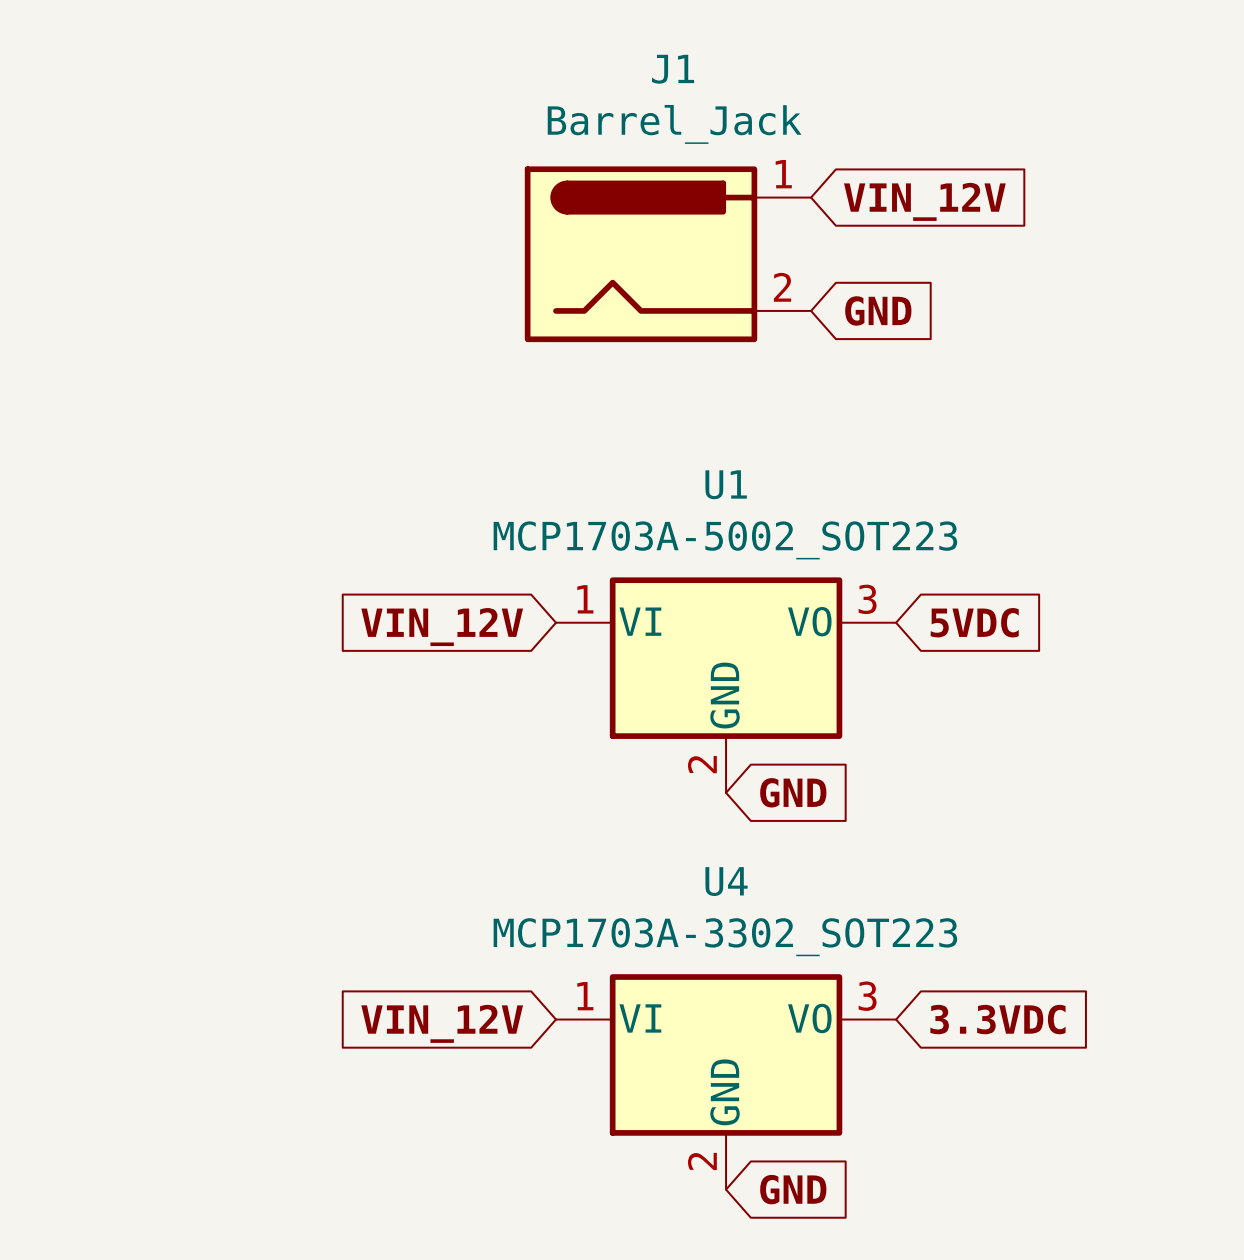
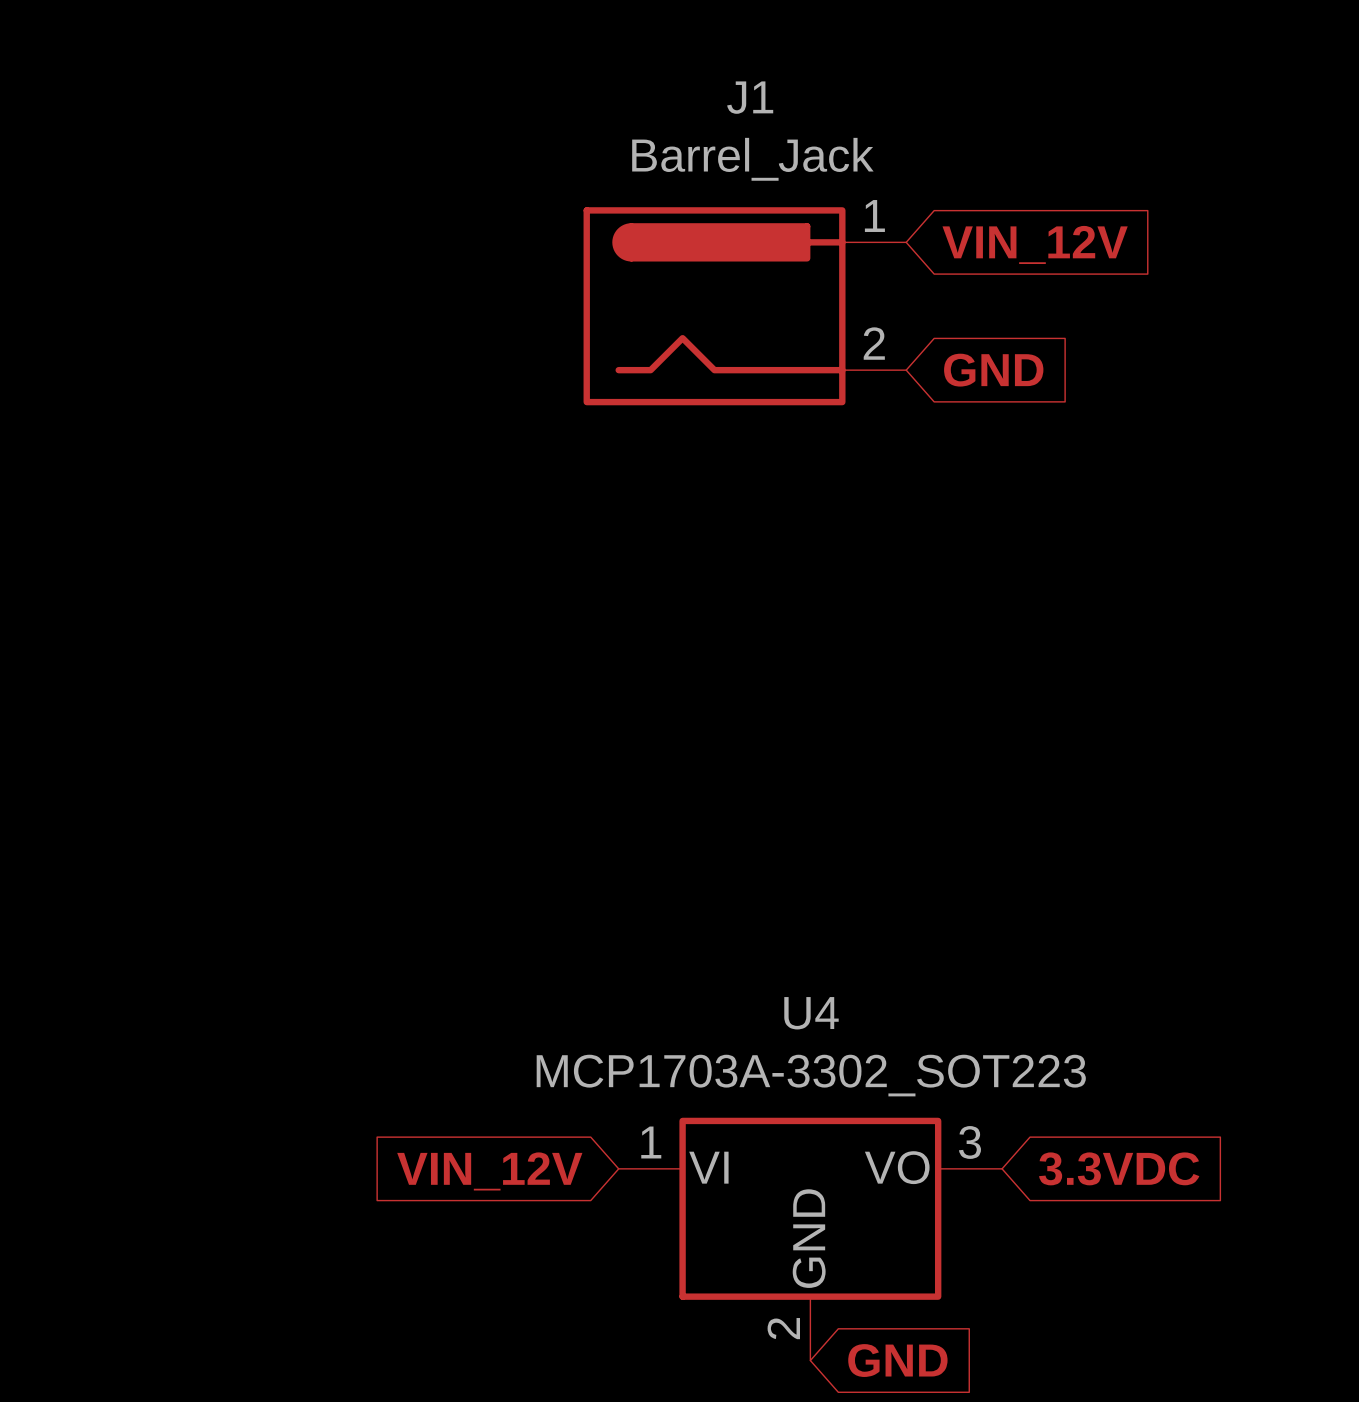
global label: 5VDC (974, 622) -> none
global label: VIN_12V (442, 627) -> none
U1: MCP1703A-5002_SOT223 (726, 685) -> none
global label: GND (793, 792) -> none

